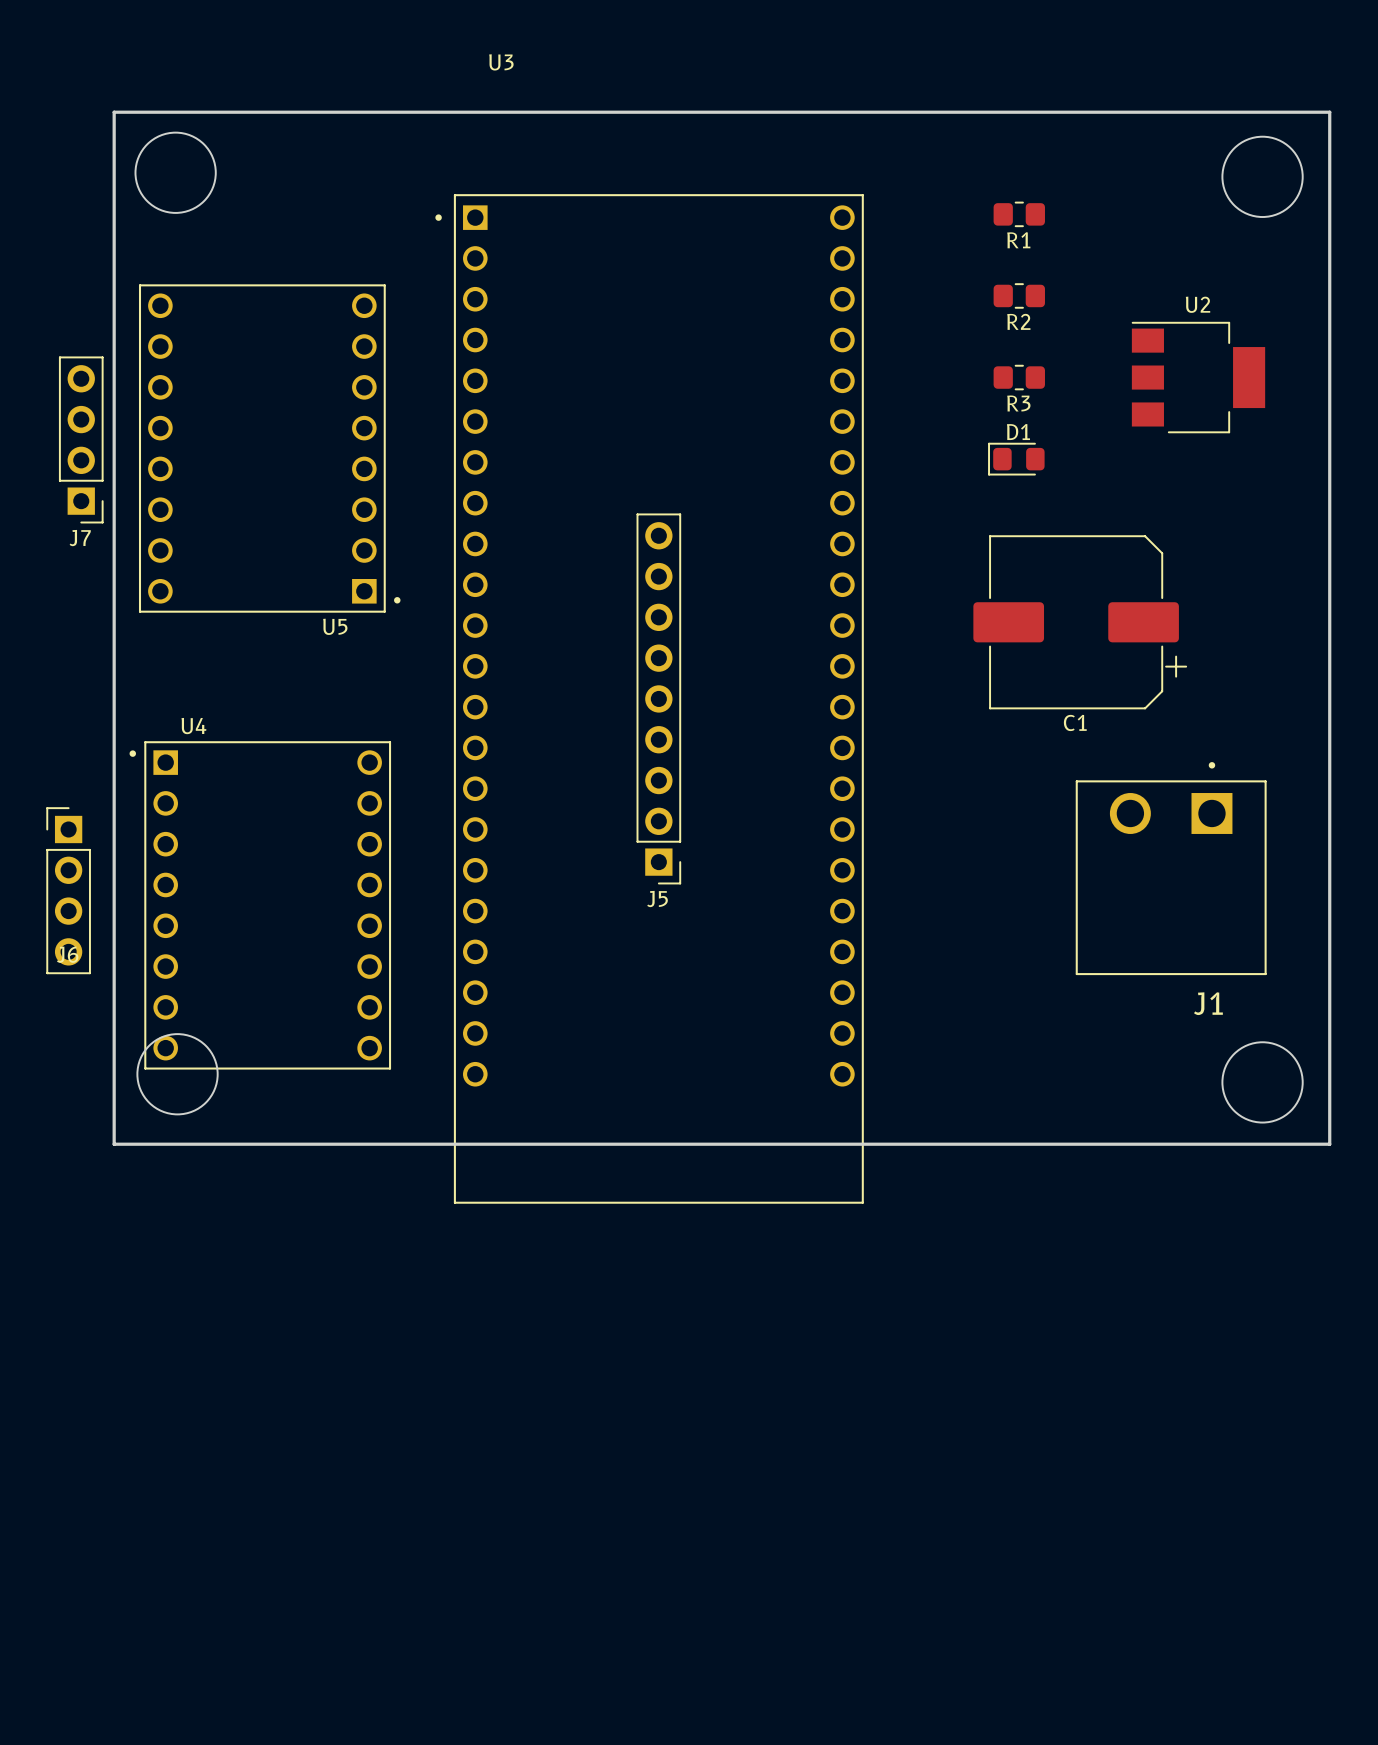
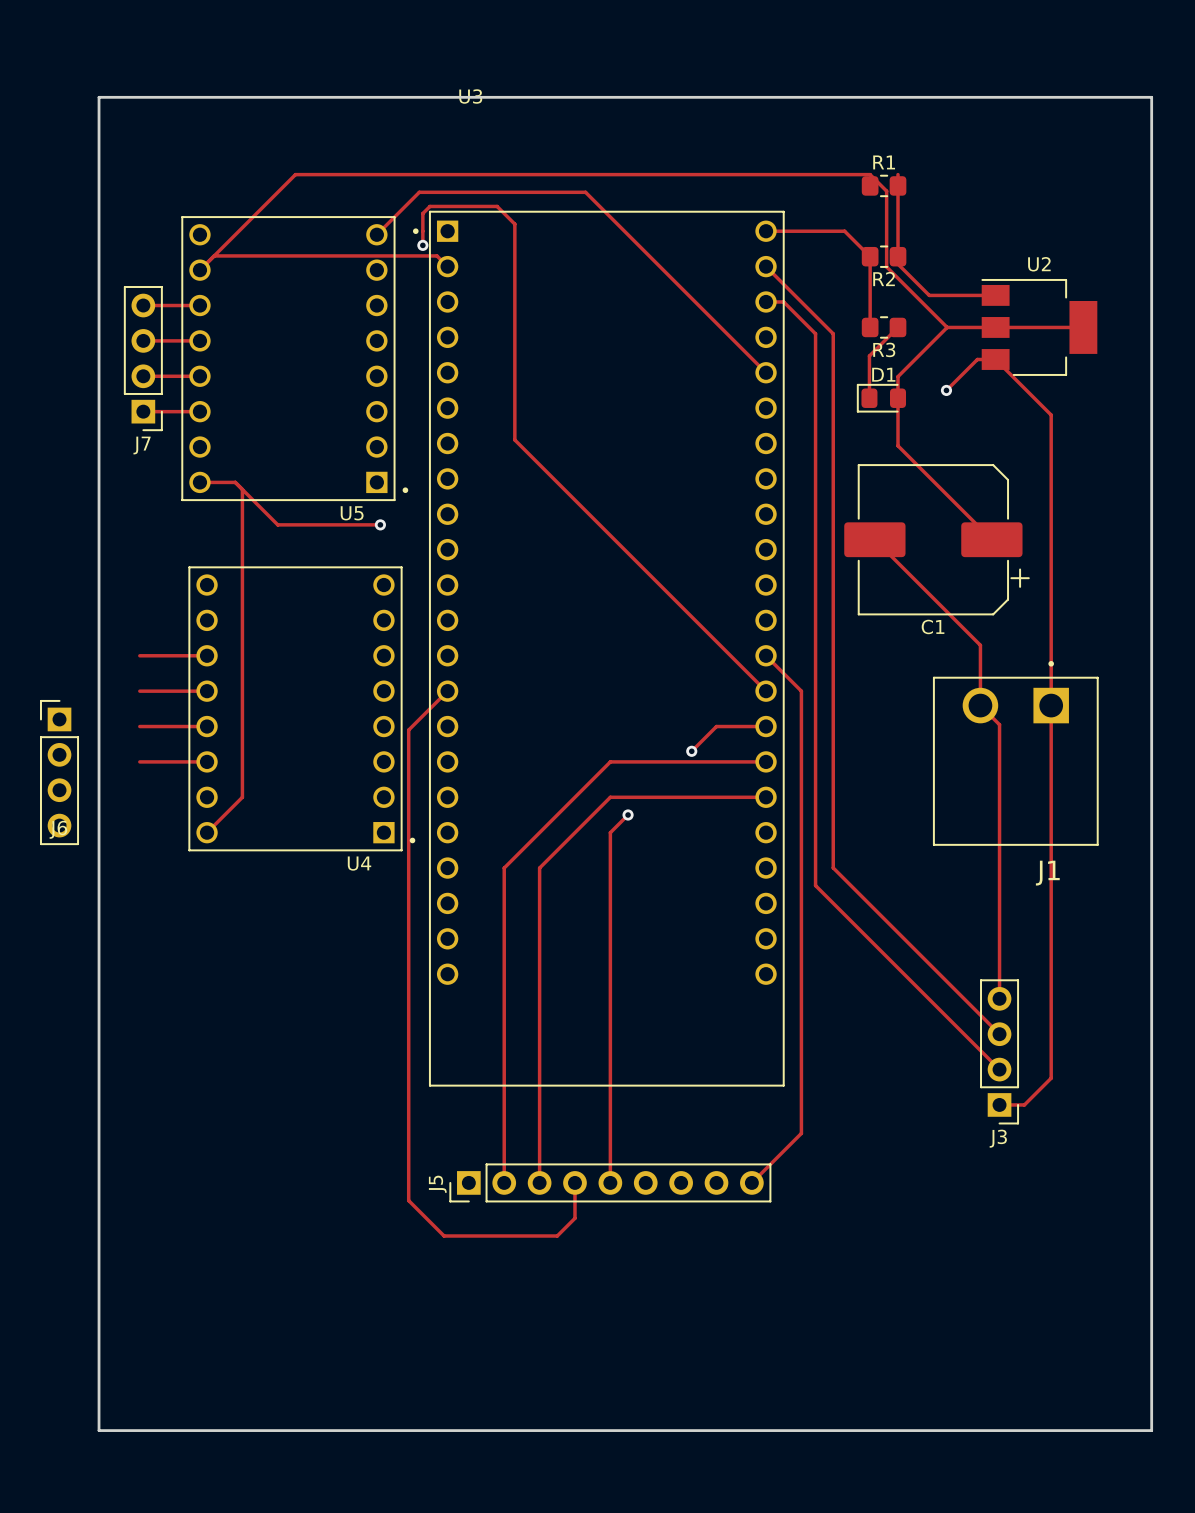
board edge: (1327, 112) (1329, 112) (1329, 1144) (114, 1144) -> (1151, 97) (1151, 1430) (99, 1430) (99, 992)
round board edge: [134, 131, 217, 214] -> none
round board edge: [1221, 135, 1304, 218] -> none
track: none -> (898, 174) (898, 264) (929, 295) (995, 295)
R1 name position: R1 (1018, 240) -> R1 (884, 162)
track: none -> (766, 231) (844, 231) (870, 256) (870, 327)
track: none -> (376, 234) (419, 192) (585, 192) (766, 372)
track: none -> (422, 245) (422, 213) (429, 206) (497, 206) (514, 224) (514, 439) (766, 691)
via: none -> (422, 245)
track: none -> (214, 255) (436, 255) (447, 266)
track: none -> (766, 266) (833, 333) (833, 867) (999, 1034)
track: none -> (199, 270) (295, 174) (870, 174) (886, 191) (886, 266) (947, 327)
track: none -> (766, 301) (783, 301) (815, 333) (815, 885) (999, 1069)
track: none -> (143, 305) (199, 305)
track: none -> (898, 327) (869, 356) (869, 398)
track: none -> (947, 327) (1083, 327)
track: none -> (947, 327) (898, 376) (898, 445) (991, 539)
track: none -> (143, 340) (199, 340)
track: none -> (143, 376) (199, 376)
J7 position: (81, 439) -> (143, 358)
U5 position: (269, 448) -> (294, 358)
track: none -> (946, 390) (977, 359) (995, 359) (1051, 415) (1051, 1078) (1024, 1104) (999, 1104)
via: none -> (946, 390)
track: none -> (143, 411) (199, 411)
track: none -> (199, 478) (199, 482) (235, 482) (277, 524) (380, 524)
track: none -> (242, 489) (242, 797) (207, 832)
via: none -> (380, 524)
track: none -> (874, 539) (980, 645) (980, 705) (999, 724) (999, 998)
U3 position: (649, 698) -> (598, 648)
J5 rotation: 0° (658, 698) -> 90° clockwise (610, 1182)
J5 position: (658, 698) -> (610, 1182)
track: none -> (139, 655) (207, 655)
track: none -> (766, 655) (801, 691) (801, 1133) (751, 1182)
track: none -> (139, 691) (207, 691)
track: none -> (447, 691) (408, 730) (408, 1200) (444, 1236) (557, 1236) (574, 1218) (574, 1182)
track: none -> (139, 726) (207, 726)
track: none -> (766, 726) (716, 726) (691, 751)
via: none -> (691, 751)
track: none -> (139, 761) (207, 761)
track: none -> (766, 761) (610, 761) (504, 868) (504, 1182)
U4 rotation: 0° (260, 905) -> 180° (301, 708)
track: none -> (766, 797) (610, 797) (539, 868) (539, 1182)
track: none -> (628, 814) (610, 832) (610, 1182)
via: none -> (628, 814)
round board edge: [136, 1033, 219, 1116] -> none
round board edge: [1221, 1041, 1304, 1124] -> none
J3: none -> (999, 1051)

